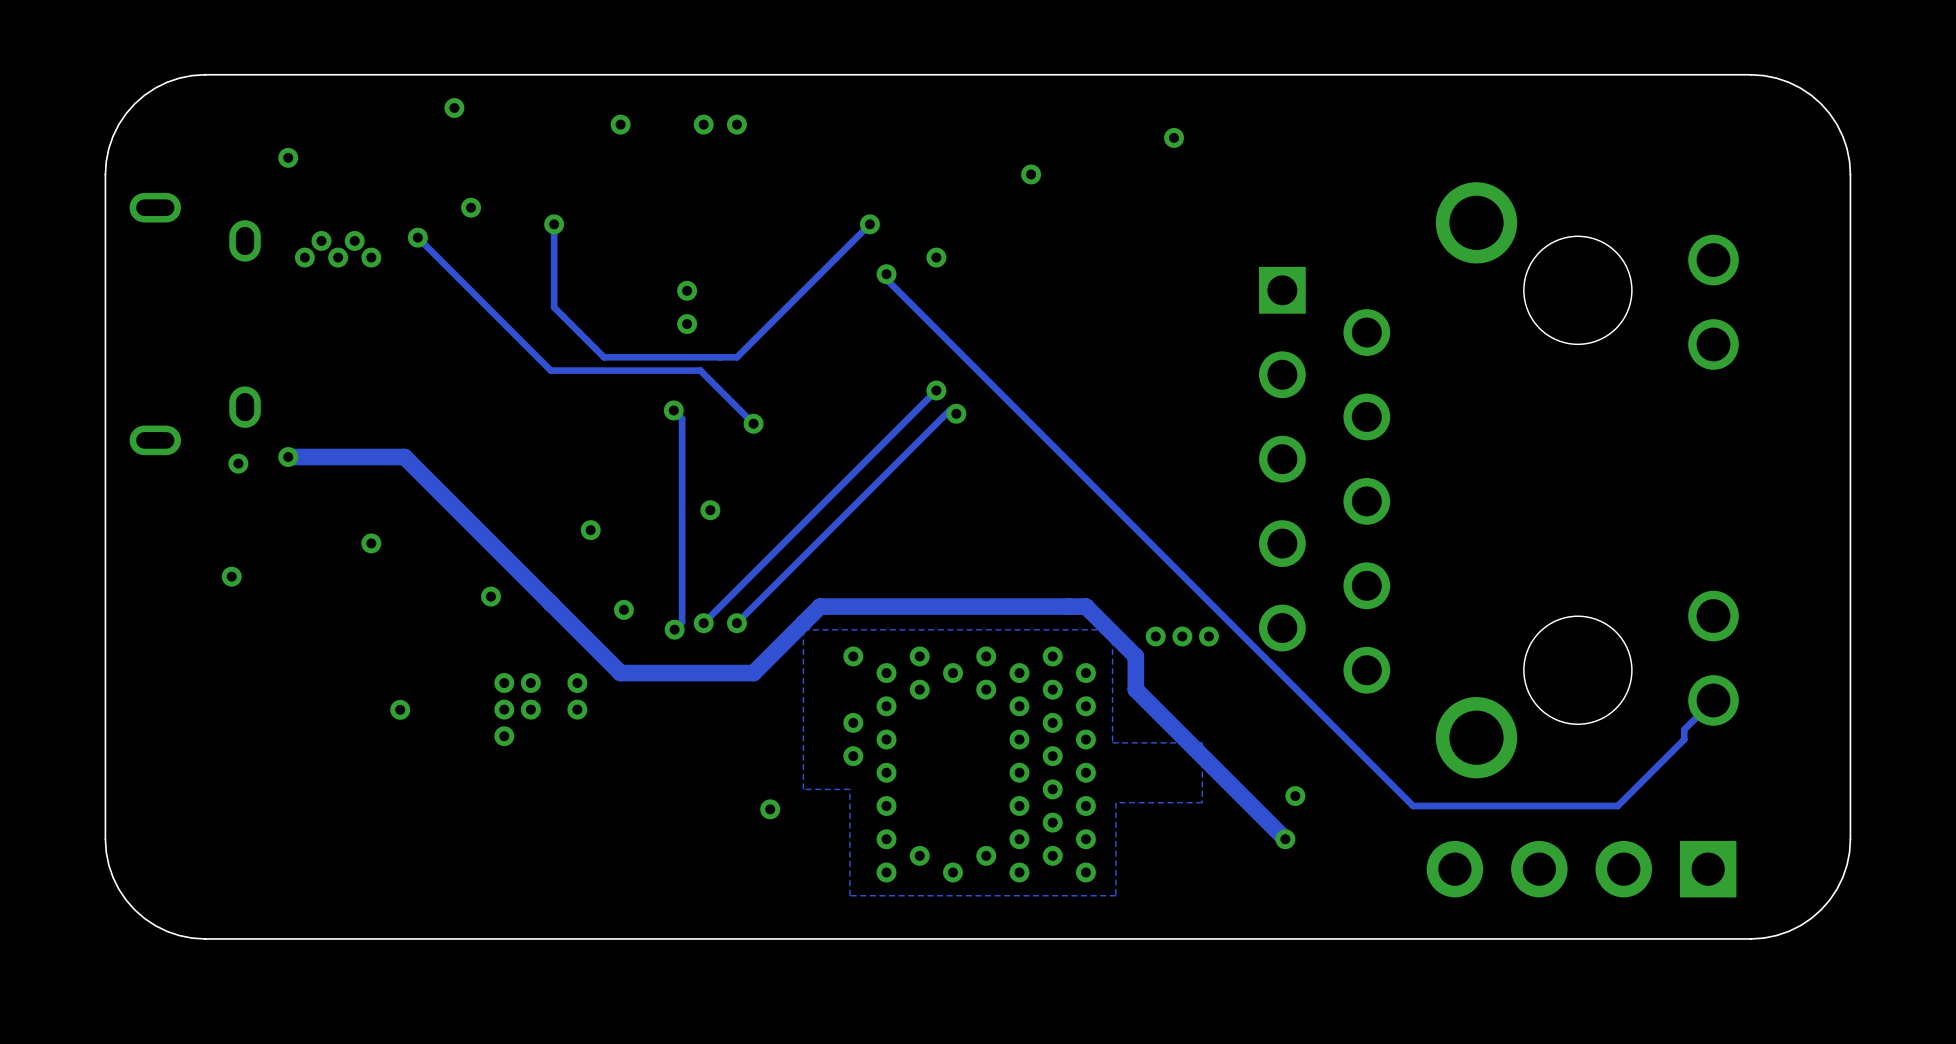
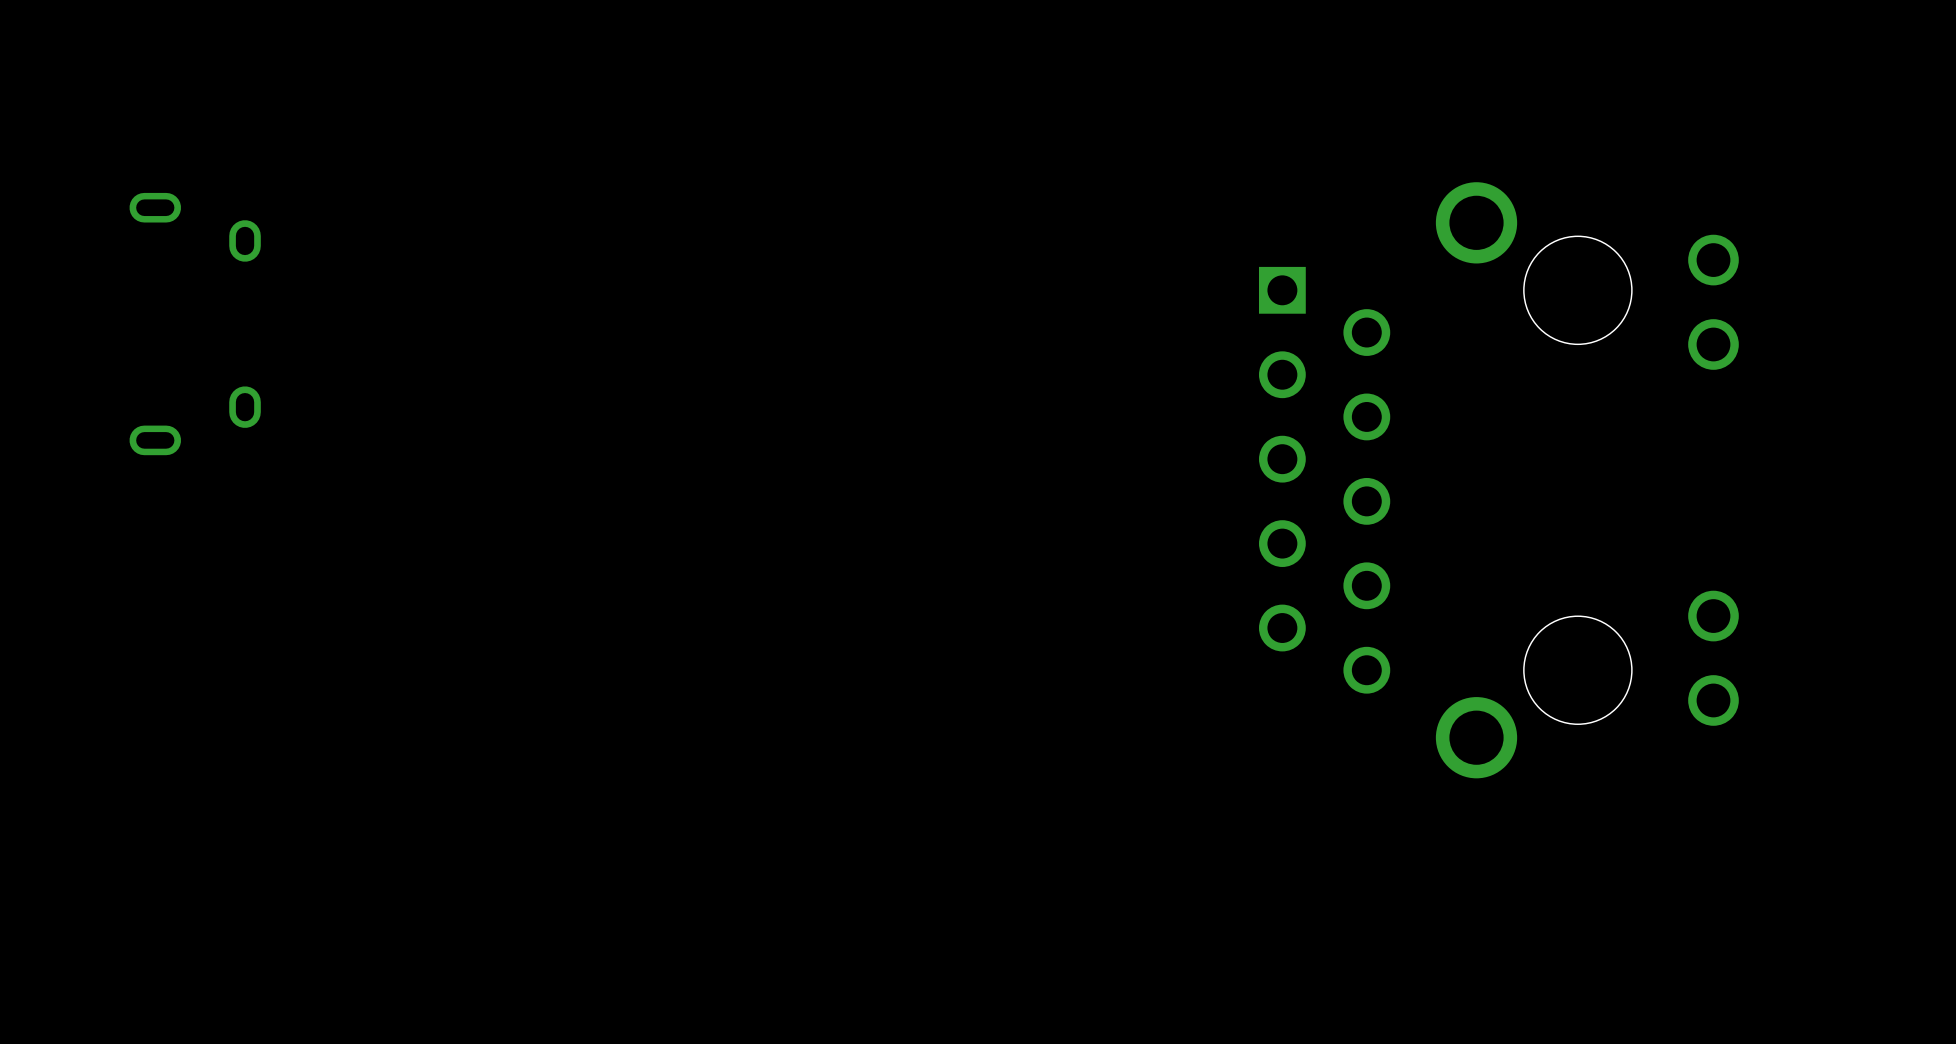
board edge: (1750, 74) (205, 74) (179, 78) (155, 88) (134, 103) (118, 124) (108, 148) (105, 174) (105, 839) (108, 865) (118, 889) (134, 909) (155, 925) (179, 935) (205, 938) (1750, 938) (1776, 935) (1800, 925) (1821, 909) (1829, 899) (1842, 877) (1849, 852) (1850, 174) (1847, 148) (1842, 136) (1837, 124) (1821, 103) (1800, 88) (1788, 82) (1763, 75) (1750, 74) -> none
via: (454, 108) -> none
via: (620, 124) -> none
via: (703, 124) -> none
via: (736, 124) -> none
via: (1174, 137) -> none
via: (288, 157) -> none
via: (1031, 174) -> none
via: (471, 207) -> none
via: (554, 224) -> none
track: (869, 224) (736, 357) (604, 357) (554, 307) (554, 224) -> none
via: (869, 224) -> none
track: (417, 237) (550, 370) (700, 370) (753, 423) -> none
via: (417, 237) -> none
via: (321, 240) -> none
via: (354, 240) -> none
via: (304, 257) -> none
via: (338, 257) -> none
via: (371, 257) -> none
via: (936, 257) -> none
track: (886, 274) (886, 279) (1413, 806) (1617, 806) (1684, 739) (1684, 729) (1713, 700) -> none
via: (886, 274) -> none
via: (687, 290) -> none
via: (687, 324) -> none
track: (936, 390) (703, 623) -> none
via: (936, 390) -> none
track: (673, 410) (682, 418) (682, 622) (674, 629) -> none
via: (673, 410) -> none
track: (956, 413) (953, 410) (949, 410) (736, 623) -> none
via: (956, 413) -> none
via: (753, 423) -> none
track: (288, 457) (404, 457) (620, 673) (753, 673) (820, 606) (1085, 606) (1135, 656) (1135, 689) (1285, 839) -> none
via: (288, 457) -> none
via: (238, 463) -> none
via: (710, 510) -> none
via: (590, 530) -> none
via: (371, 543) -> none
via: (231, 576) -> none
via: (490, 596) -> none
via: (623, 609) -> none
via: (703, 623) -> none
via: (736, 623) -> none
via: (674, 629) -> none
zone outline: (1112, 629) (803, 629) (803, 789) (849, 789) (849, 895) (1115, 895) (1115, 802) (1202, 802) (1202, 742) (1112, 742) (1112, 629) -> none
via: (1155, 636) -> none
via: (1182, 636) -> none
via: (1208, 636) -> none
via: (853, 656) -> none
via: (919, 656) -> none
via: (986, 656) -> none
via: (1052, 656) -> none
via: (886, 673) -> none
via: (953, 673) -> none
via: (1019, 673) -> none
via: (1085, 673) -> none
via: (504, 683) -> none
via: (530, 683) -> none
via: (577, 683) -> none
via: (919, 689) -> none
via: (986, 689) -> none
via: (1052, 689) -> none
via: (886, 706) -> none
via: (1019, 706) -> none
via: (1085, 706) -> none
via: (400, 709) -> none
via: (504, 709) -> none
via: (530, 709) -> none
via: (577, 709) -> none
via: (853, 722) -> none
via: (1052, 722) -> none
via: (504, 736) -> none
via: (886, 739) -> none
via: (1019, 739) -> none
via: (1085, 739) -> none
via: (853, 756) -> none
via: (1052, 756) -> none
via: (886, 772) -> none
via: (1019, 772) -> none
via: (1085, 772) -> none
via: (1052, 789) -> none
via: (1295, 796) -> none
via: (886, 806) -> none
via: (1019, 806) -> none
via: (1085, 806) -> none
via: (770, 809) -> none
via: (1052, 822) -> none
via: (886, 839) -> none
via: (1019, 839) -> none
via: (1085, 839) -> none
via: (1285, 839) -> none
via: (919, 855) -> none
via: (986, 855) -> none
via: (1052, 855) -> none
part: (1581, 869) -> none
via: (886, 872) -> none
via: (953, 872) -> none
via: (1019, 872) -> none
via: (1085, 872) -> none

